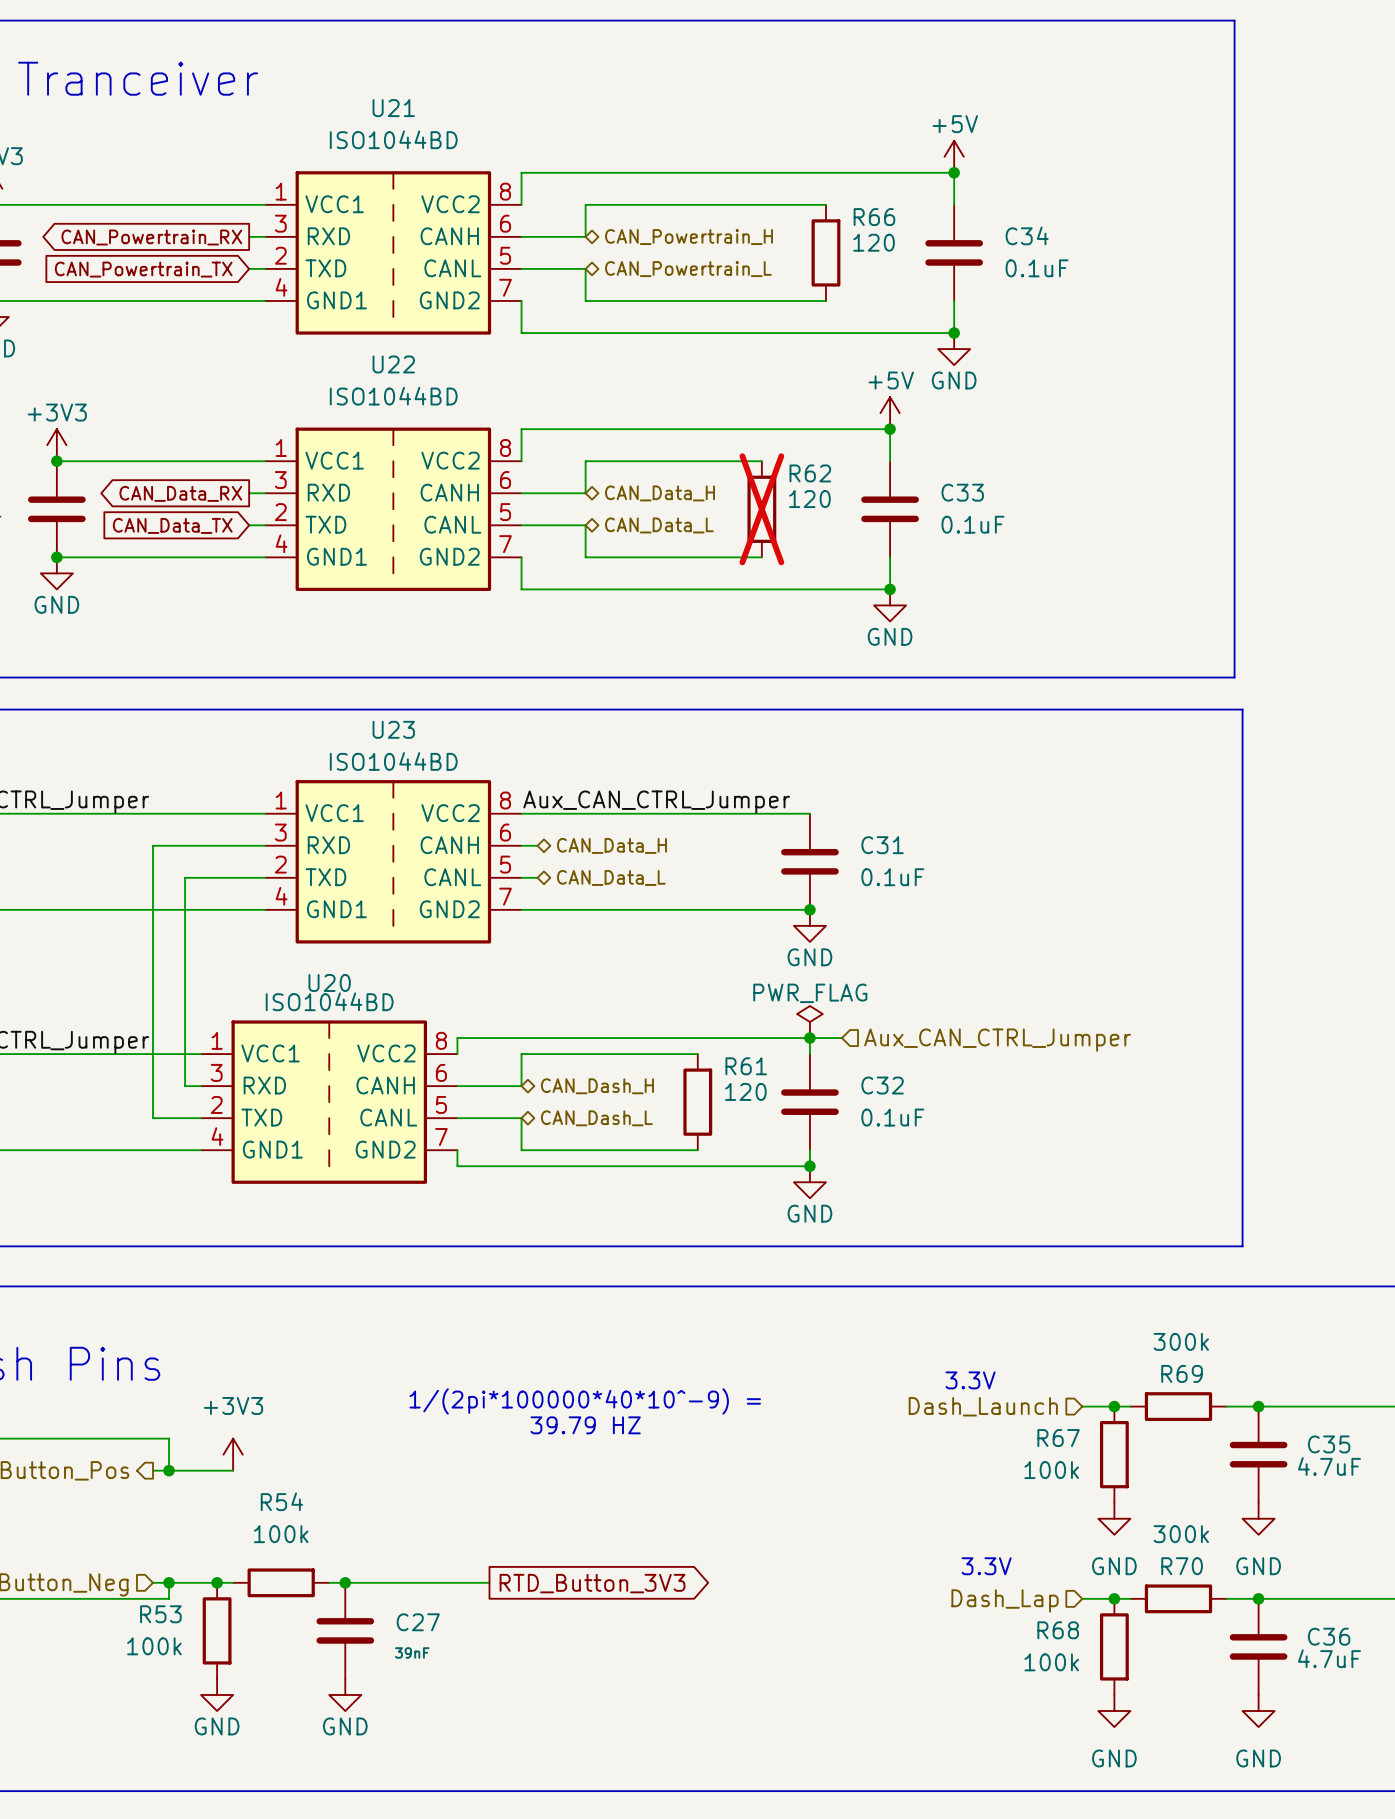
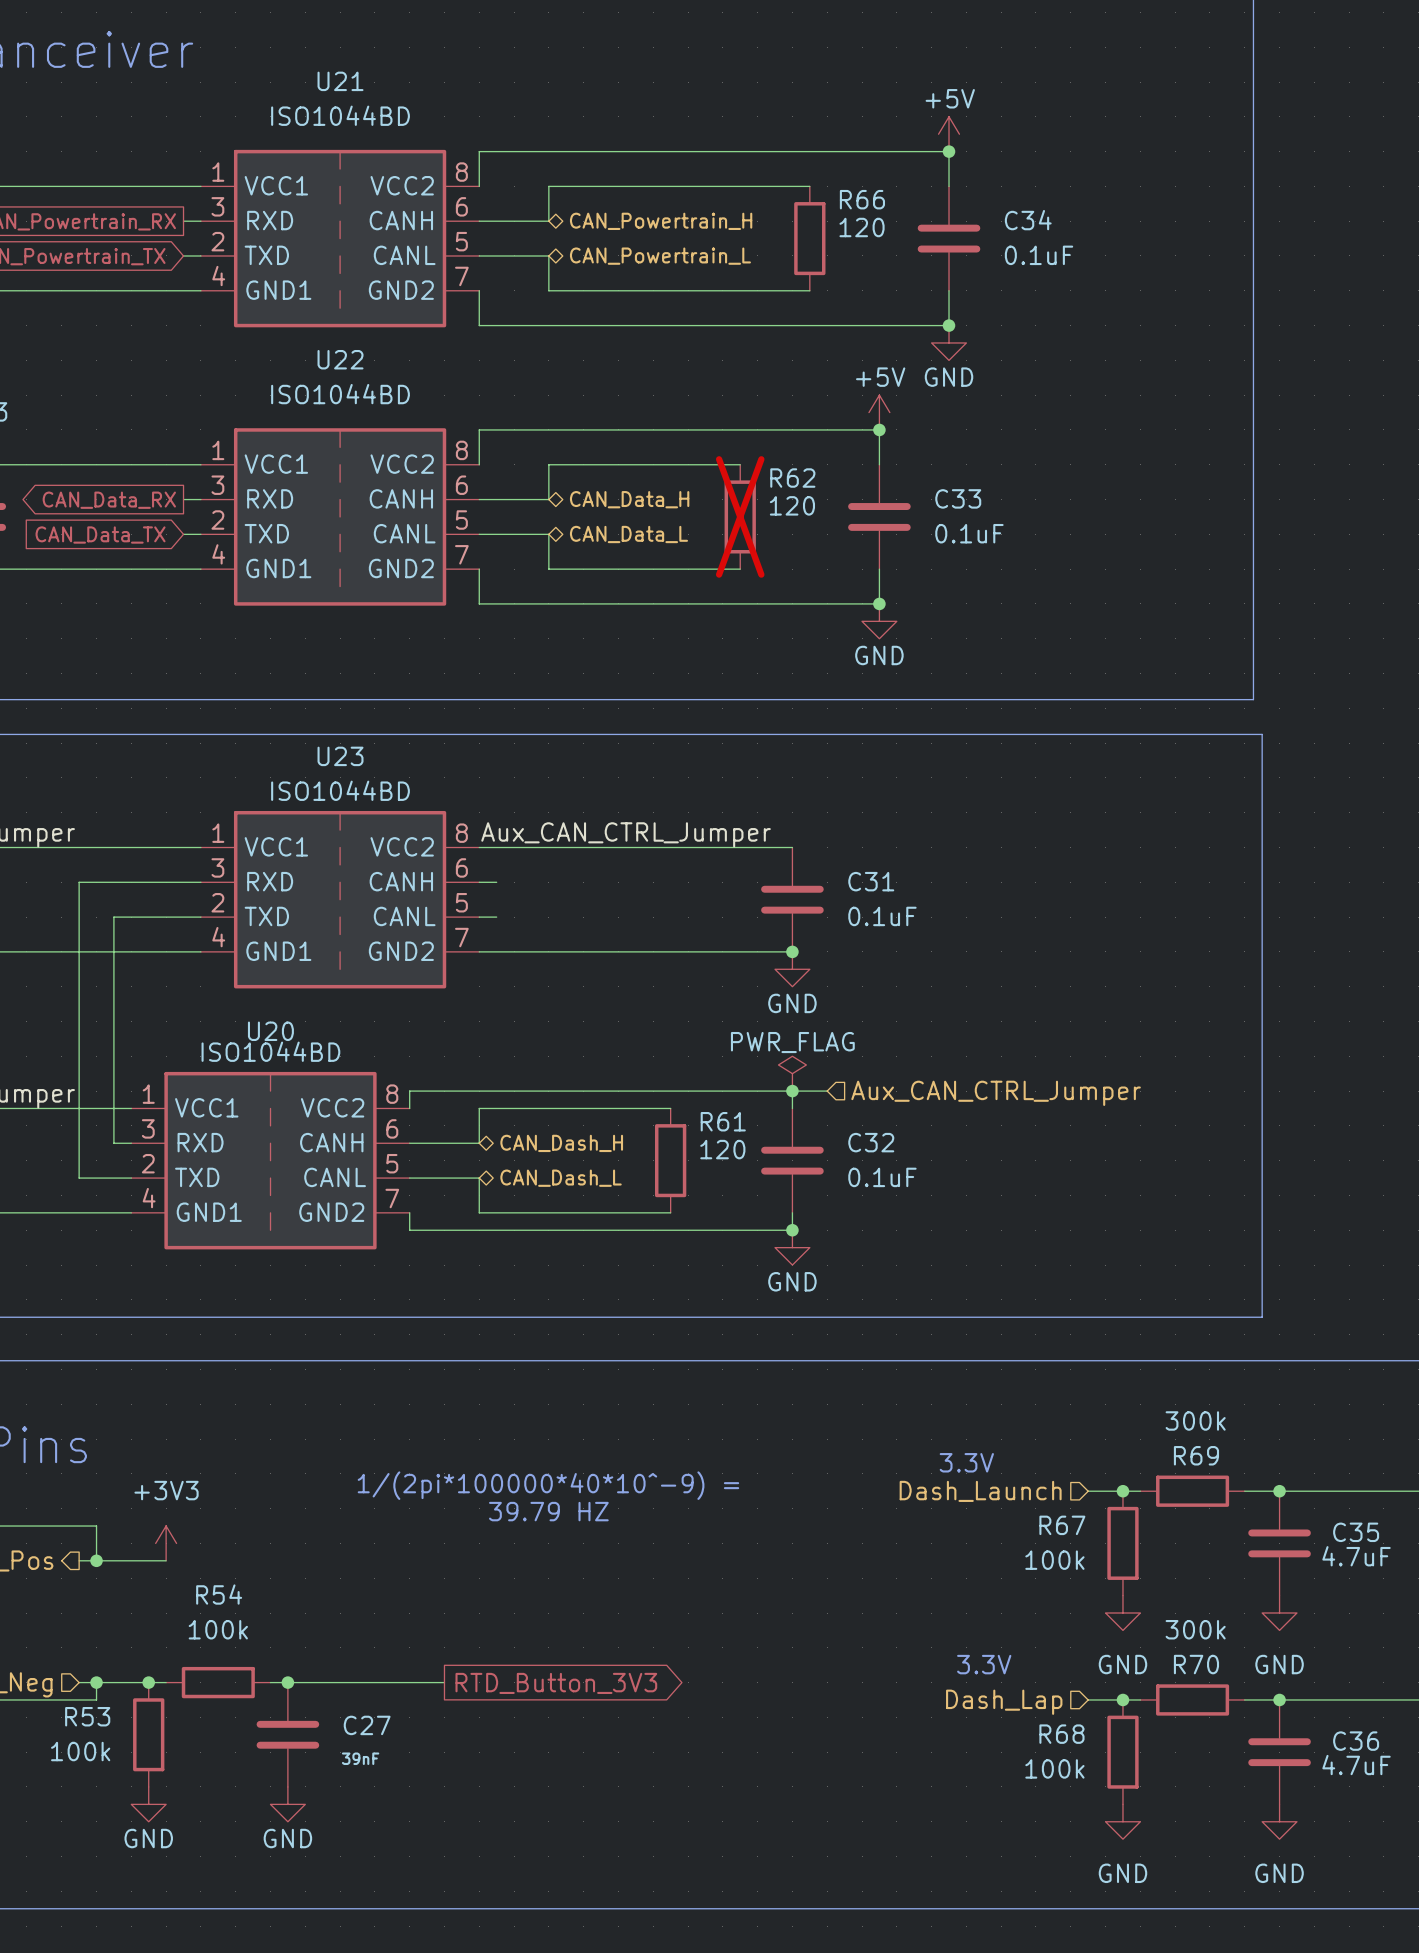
hierarchical label: CAN_Data_H (611, 845) -> none
hierarchical label: CAN_Data_L (611, 877) -> none

